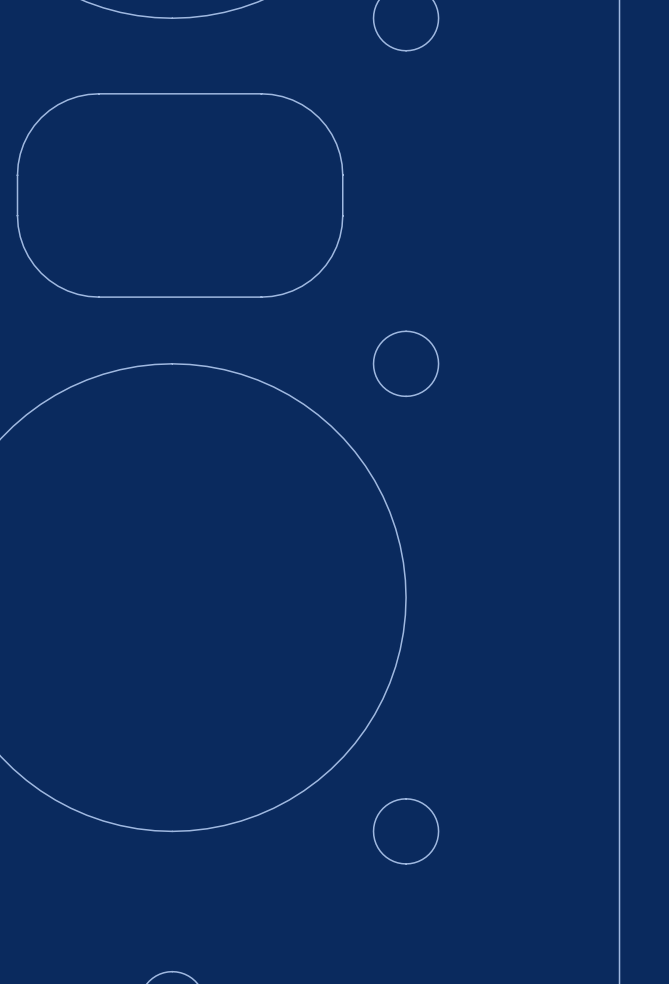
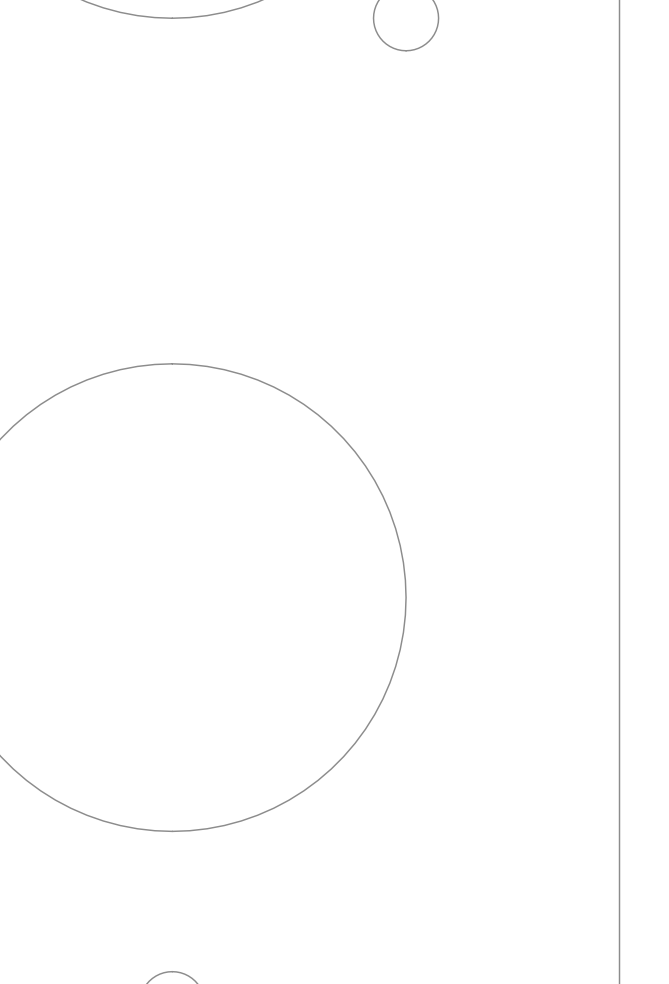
line: (98, 93) (261, 93) -> none
line: (98, 93) (67, 100) (41, 117) (23, 144) (17, 175) -> none
line: (261, 93) (292, 100) (318, 117) (336, 144) (342, 175) -> none
line: (17, 175) (17, 215) -> none
line: (342, 175) (342, 215) -> none
line: (17, 215) (23, 246) (41, 273) (67, 290) (98, 297) -> none
line: (342, 215) (336, 246) (318, 273) (292, 290) (261, 297) -> none
line: (98, 297) (261, 297) -> none
line: (406, 331) (418, 333) (429, 340) (436, 351) (438, 363) (436, 376) (429, 386) (418, 393) (406, 396) (393, 393) (383, 386) (376, 376) (373, 363) (376, 351) (383, 340) (393, 333) (406, 331) -> none
line: (406, 798) (418, 801) (429, 808) (436, 818) (438, 831) (436, 843) (429, 854) (418, 861) (406, 863) (393, 861) (383, 854) (376, 843) (373, 831) (376, 818) (383, 808) (393, 801) (406, 798) -> none

